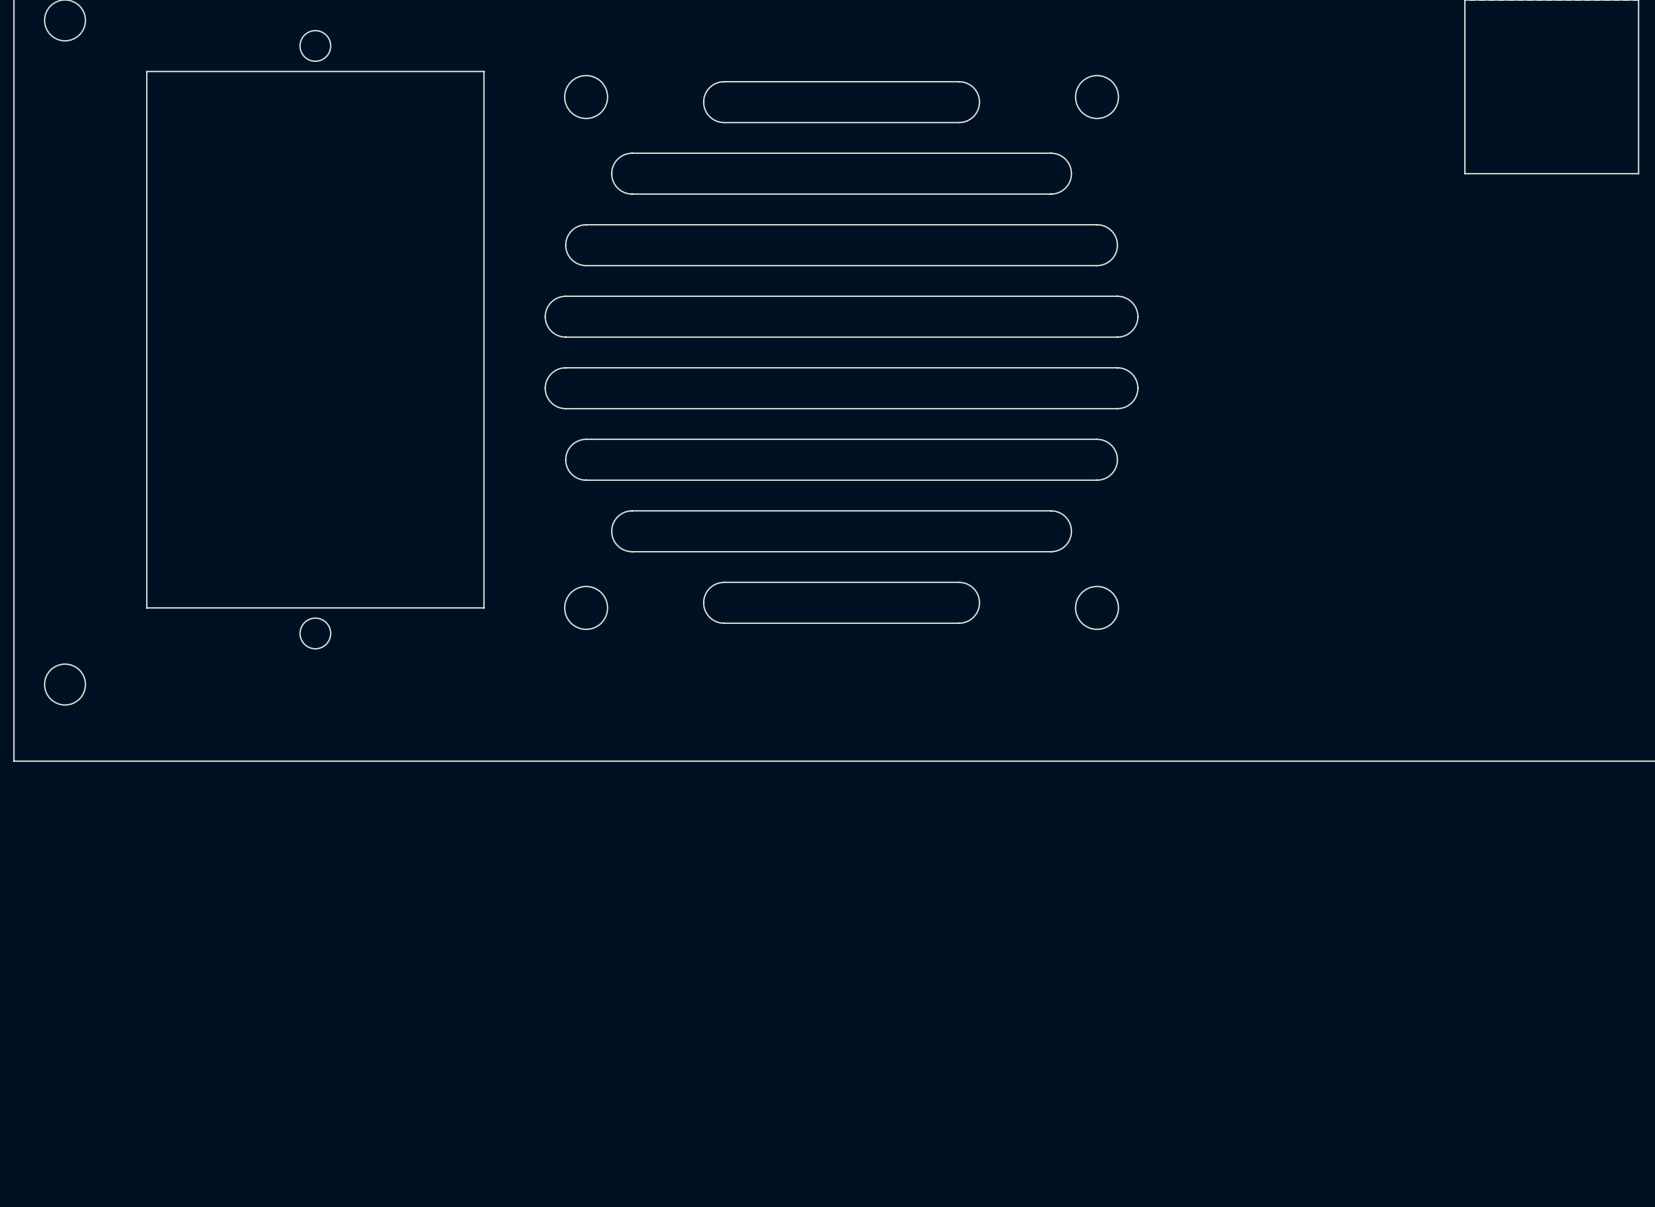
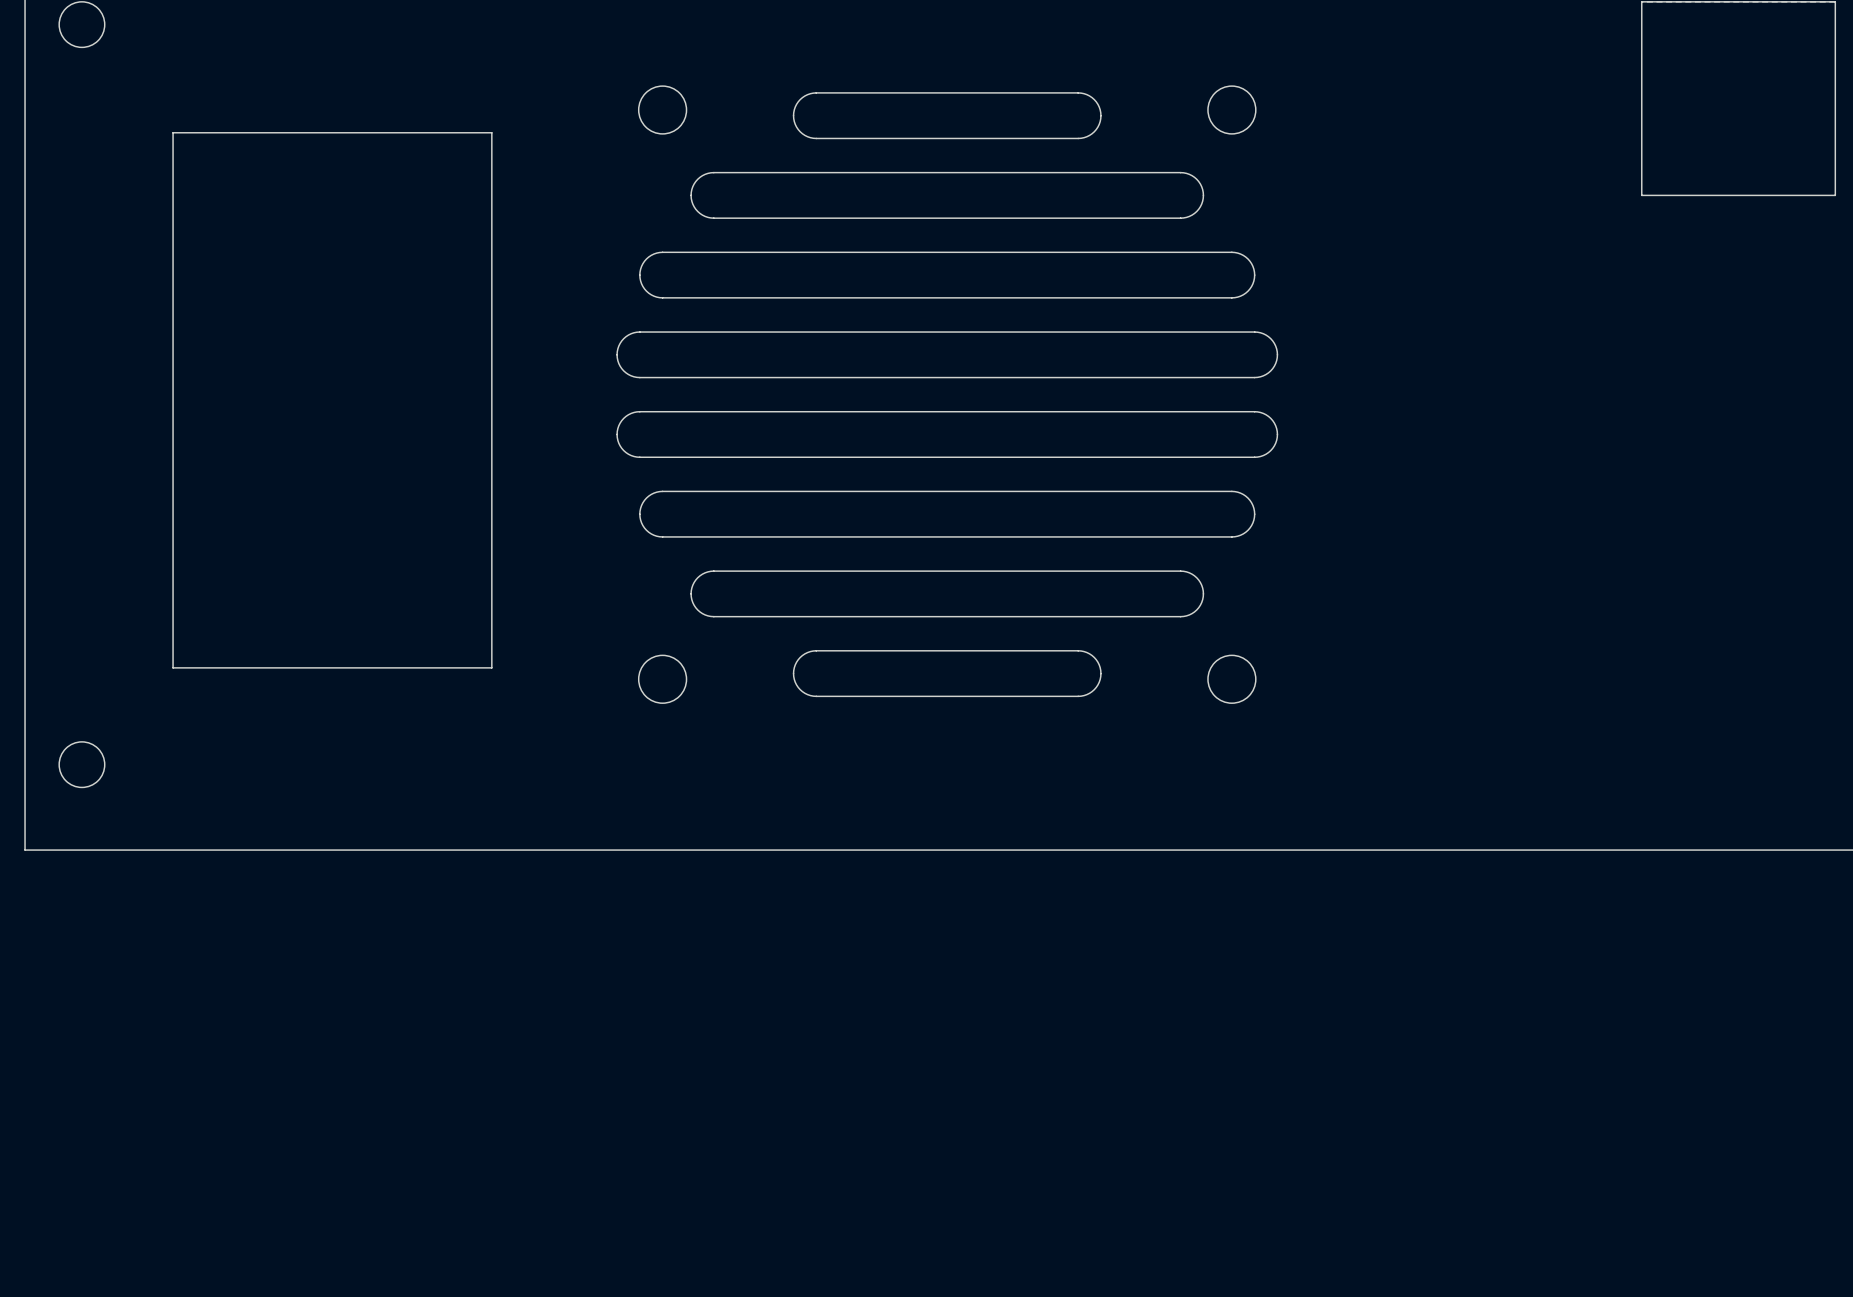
round board edge: [299, 30, 332, 62] -> none
board edge: (146, 117) (146, 71) (483, 71) (483, 607) (146, 607) (146, 597) -> (173, 132) (491, 132) (491, 667) (173, 667)
round board edge: [299, 617, 332, 650] -> none

